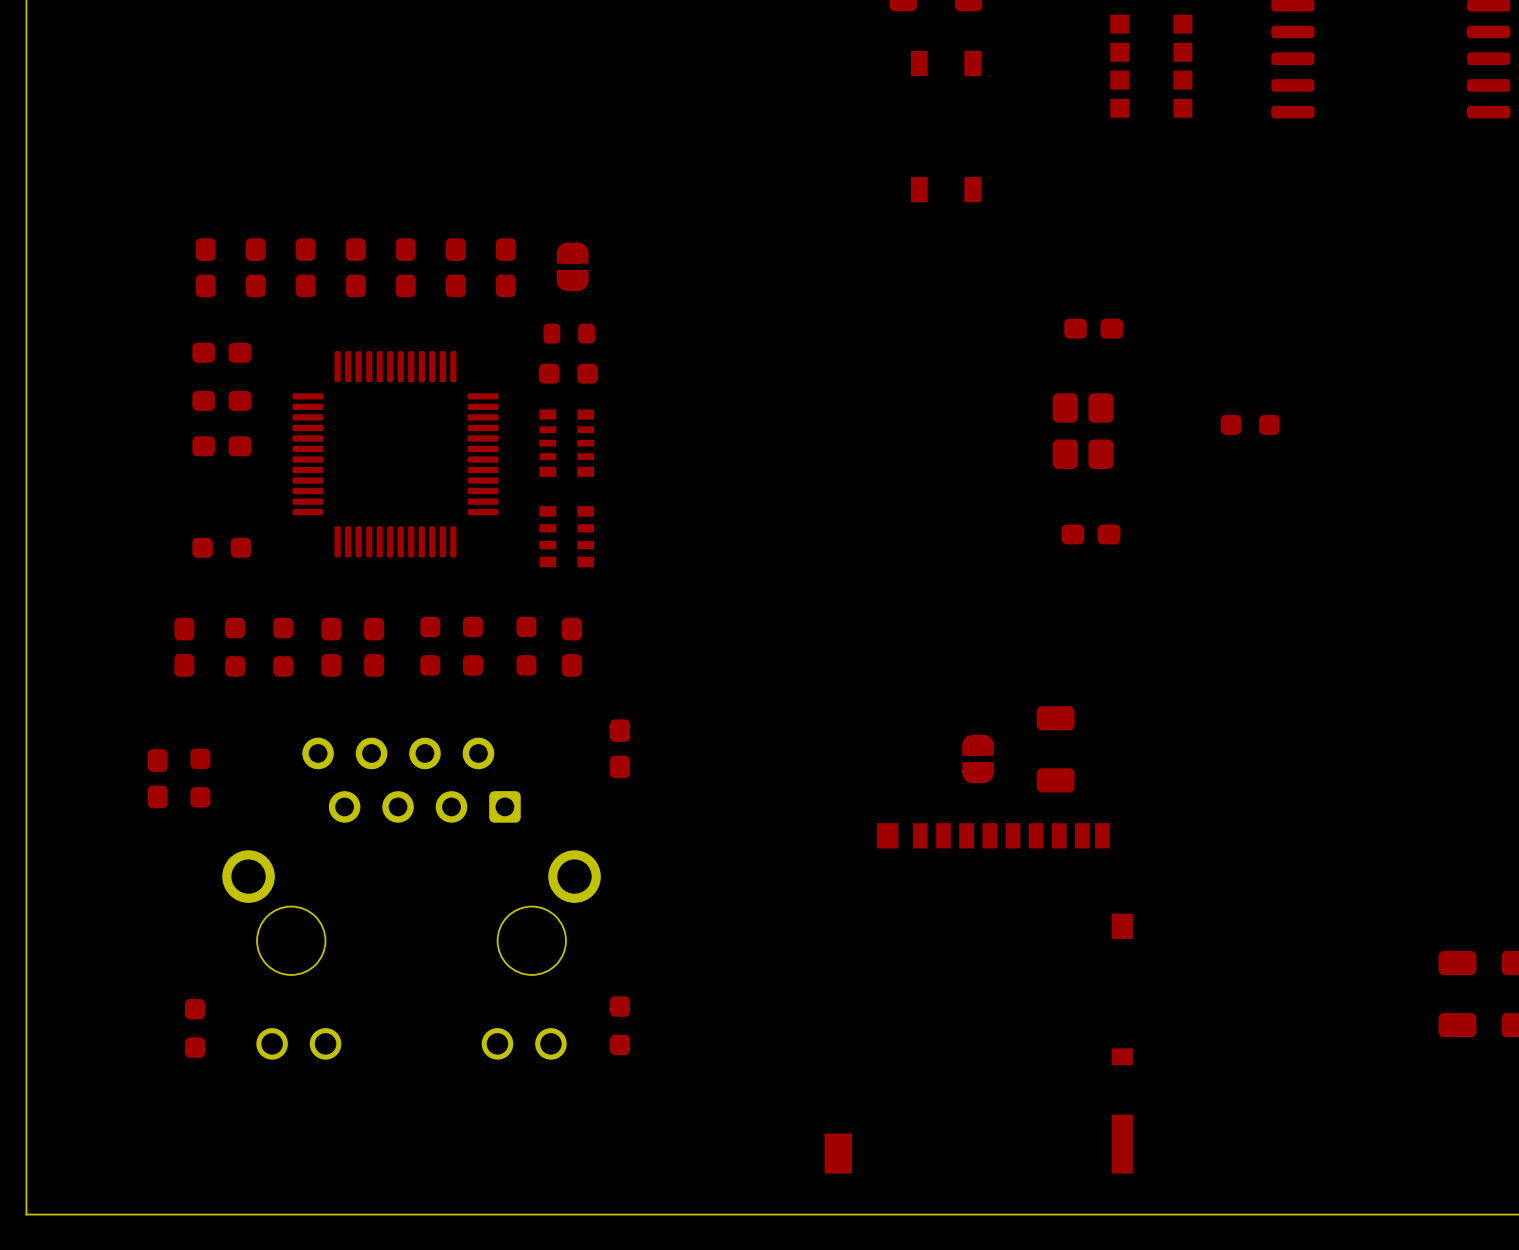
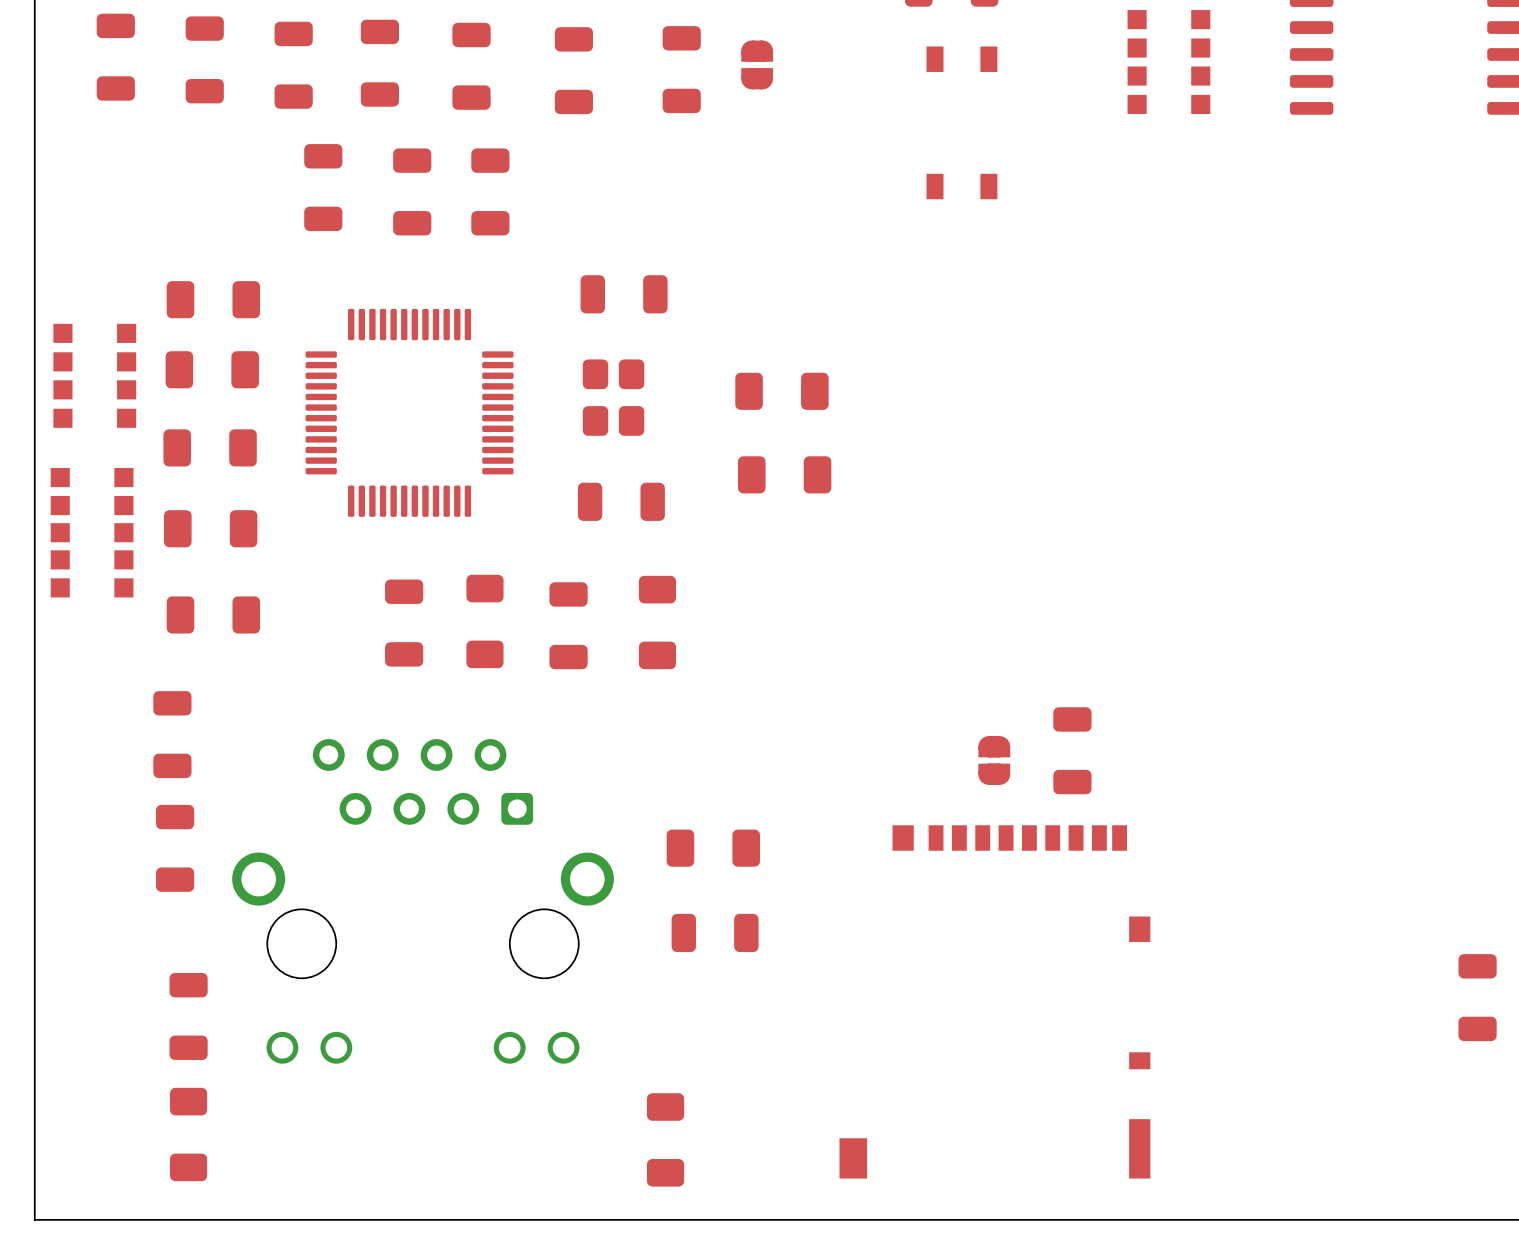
part: none -> (115, 57)
part: none -> (204, 59)
part: none -> (379, 63)
part: none -> (293, 65)
part: none -> (471, 66)
part: none -> (681, 69)
part: none -> (573, 70)
part: none -> (323, 187)
part: none -> (412, 191)
part: none -> (490, 191)
part position: (572, 266) -> (757, 64)
part: (205, 267) -> none
part: (255, 267) -> none
part: (305, 267) -> none
part: (355, 267) -> none
part: (405, 267) -> none
part: (455, 267) -> none
part: (505, 267) -> none
part: none -> (624, 294)
part: none -> (213, 299)
part: (1093, 328) -> none
part: (569, 333) -> none
part: (221, 352) -> none
part: none -> (212, 369)
part: (568, 373) -> none
part: none -> (94, 375)
part: none -> (781, 391)
part: (221, 400) -> none
part: (1250, 424) -> none
part position: (1083, 431) -> (613, 397)
part: (566, 443) -> none
part: (221, 446) -> none
part: none -> (210, 447)
part position: (395, 454) -> (409, 412)
part: none -> (784, 474)
part: none -> (621, 501)
part: none -> (210, 528)
part: none -> (92, 532)
part: (1090, 534) -> none
part: (566, 536) -> none
part: (221, 547) -> none
part: none -> (213, 614)
part: none -> (484, 621)
part: none -> (404, 623)
part: none -> (657, 622)
part: none -> (568, 625)
part: (430, 646) -> none
part: (473, 646) -> none
part: (526, 646) -> none
part: (184, 647) -> none
part: (235, 647) -> none
part: (283, 647) -> none
part: (331, 647) -> none
part: (374, 647) -> none
part: (571, 647) -> none
part: none -> (172, 734)
part: (619, 748) -> none
part: (157, 778) -> none
part: (200, 778) -> none
part: none -> (713, 848)
part: none -> (175, 848)
part: none -> (715, 932)
part: none -> (188, 1016)
part: (619, 1025) -> none
part: (195, 1028) -> none
part: none -> (188, 1134)
part: none -> (665, 1139)

